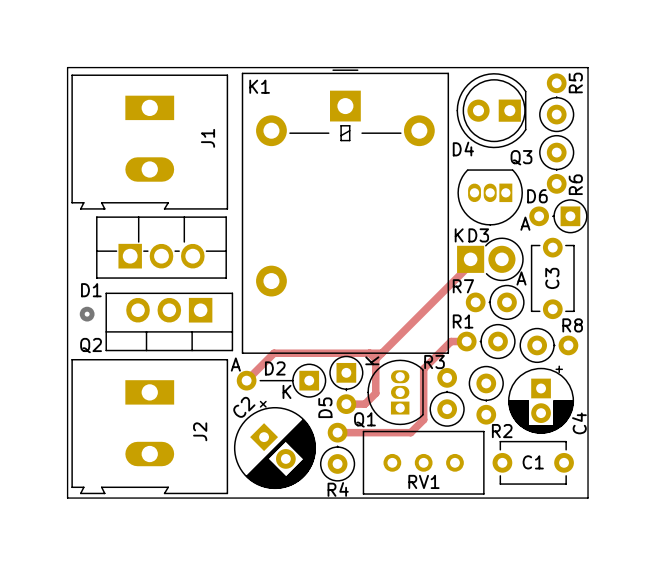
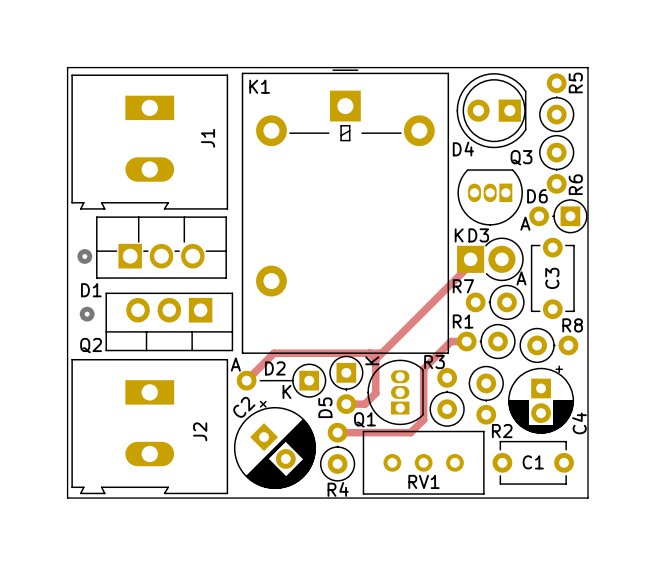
via: none -> (84, 256)

